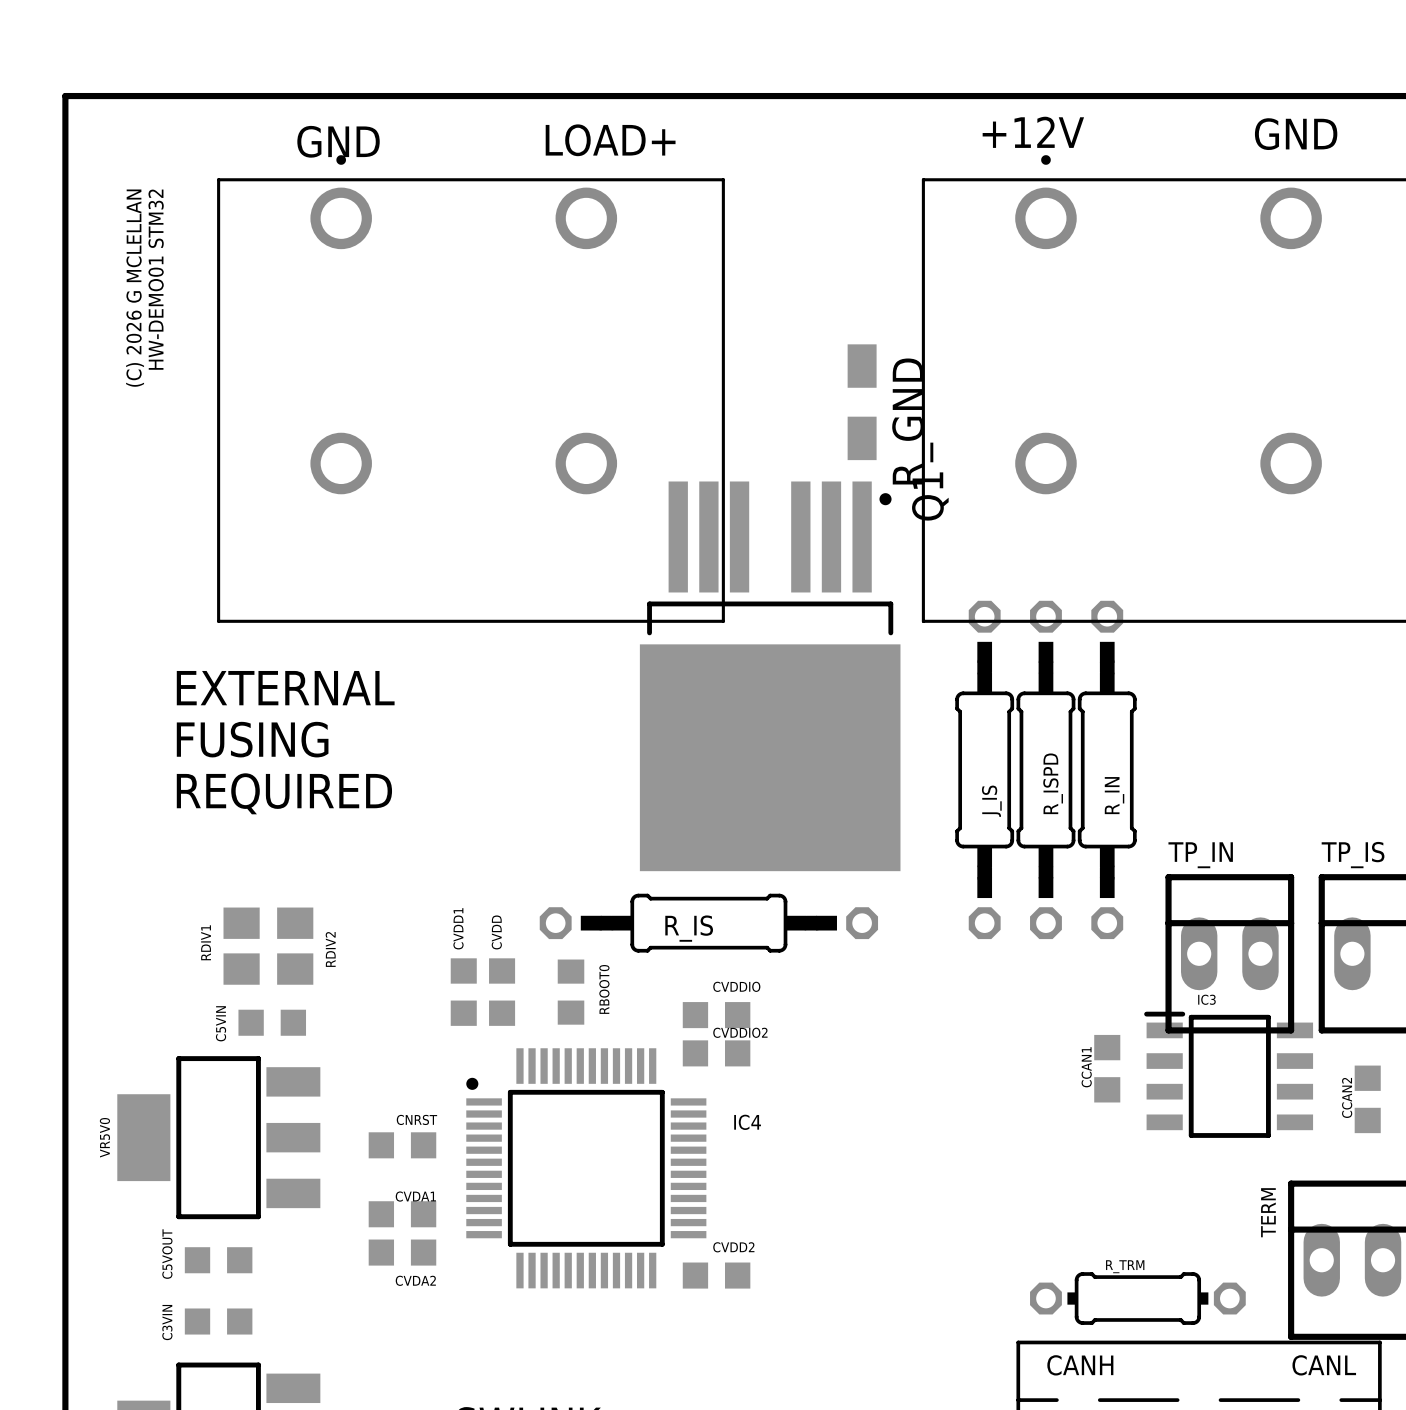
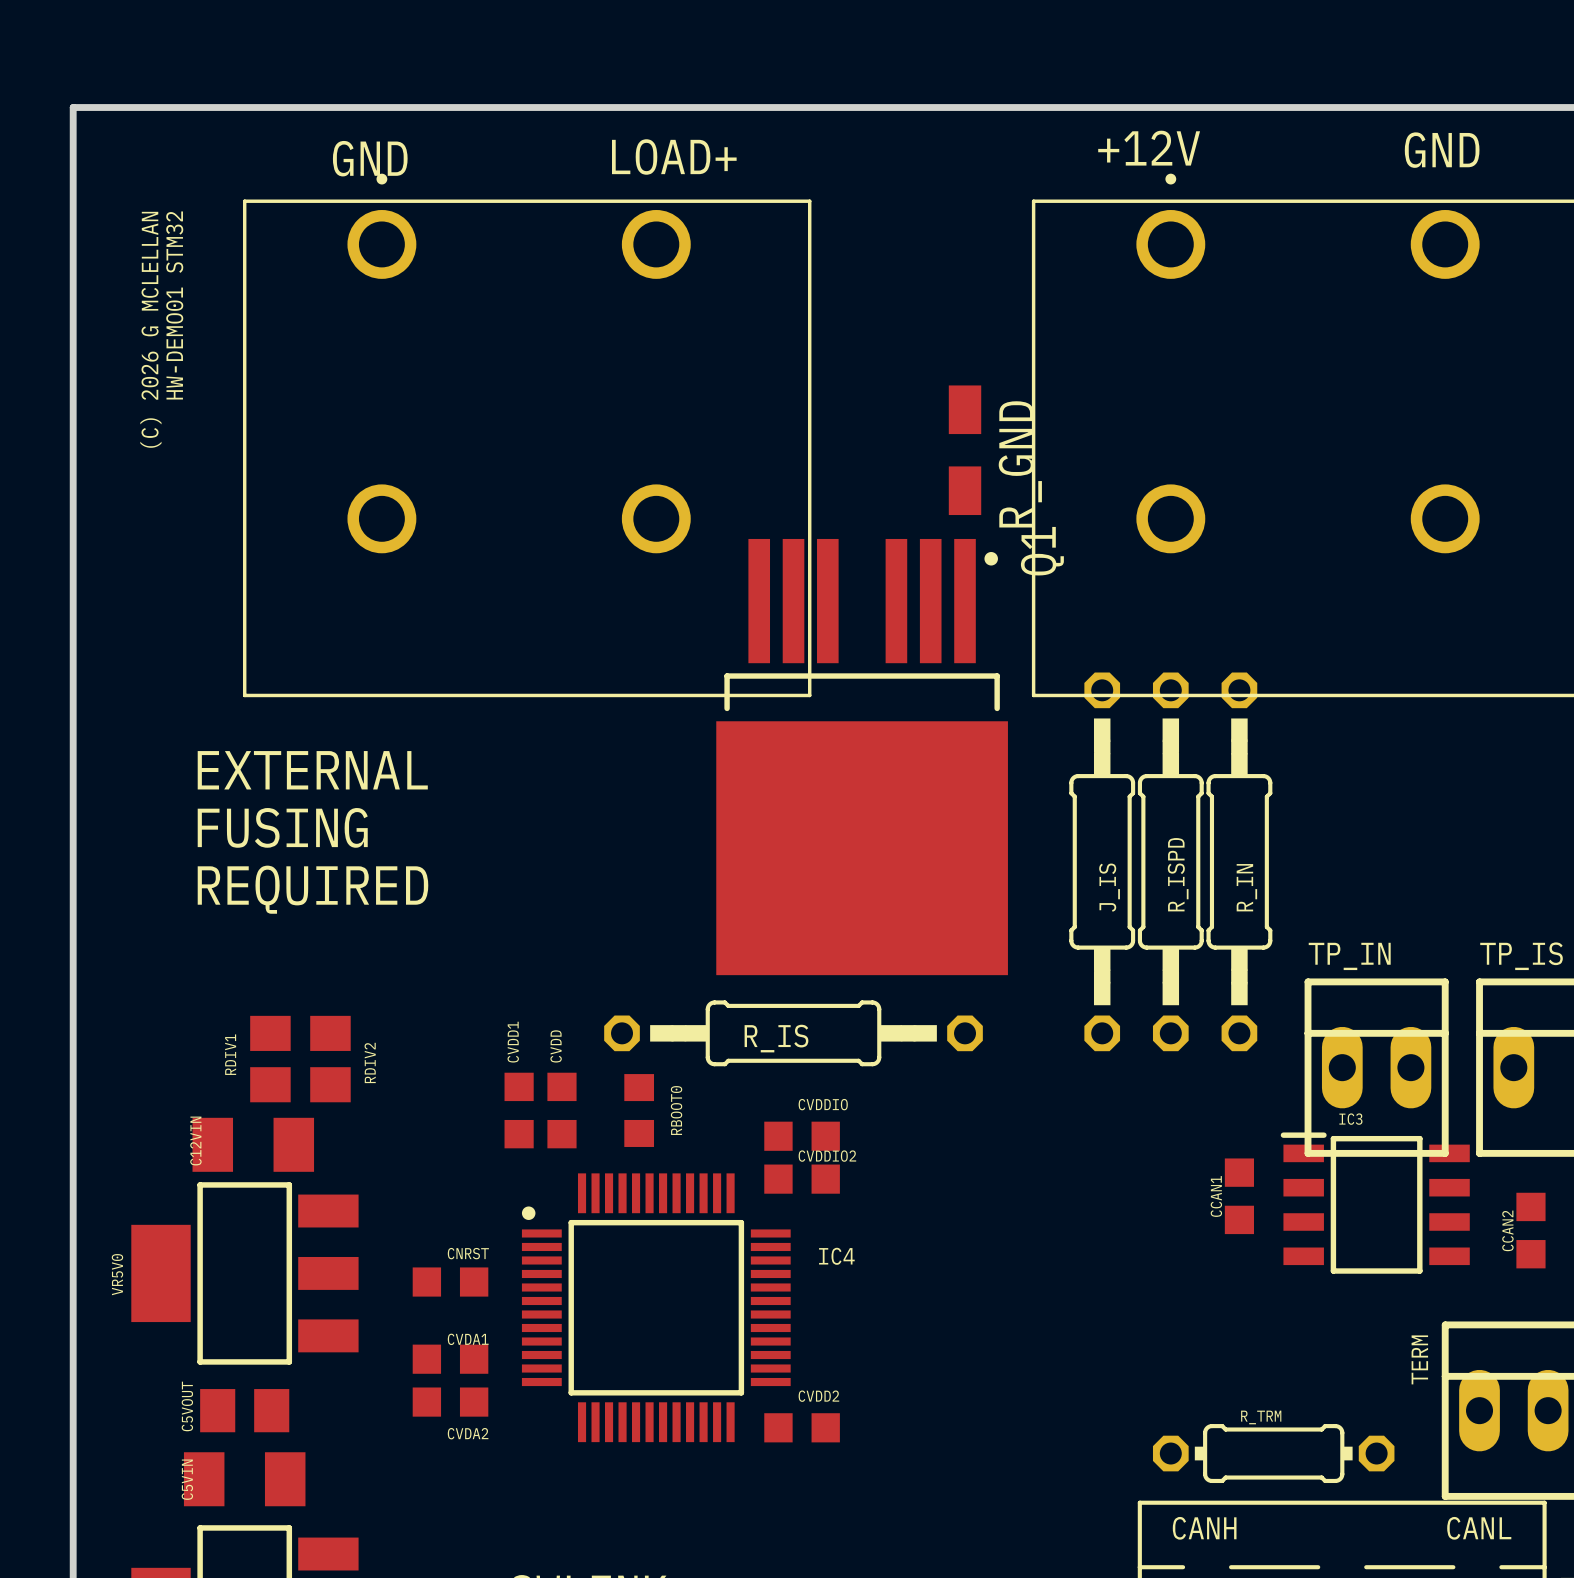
C5VIN footprint: [238, 1009, 307, 1036] -> [183, 1452, 306, 1507]
C12VIN: none -> (253, 1144)
C5VOUT footprint: [184, 1247, 253, 1274] -> [200, 1389, 290, 1433]
C3VIN: (218, 1321) -> none

